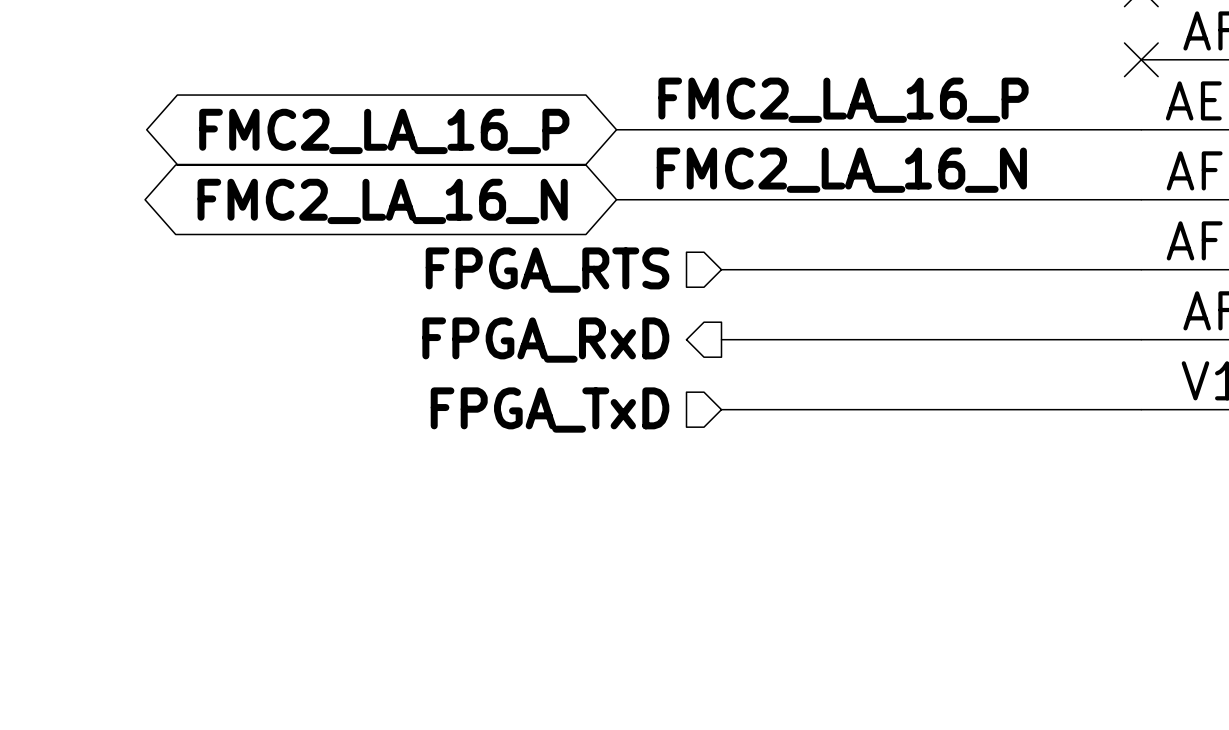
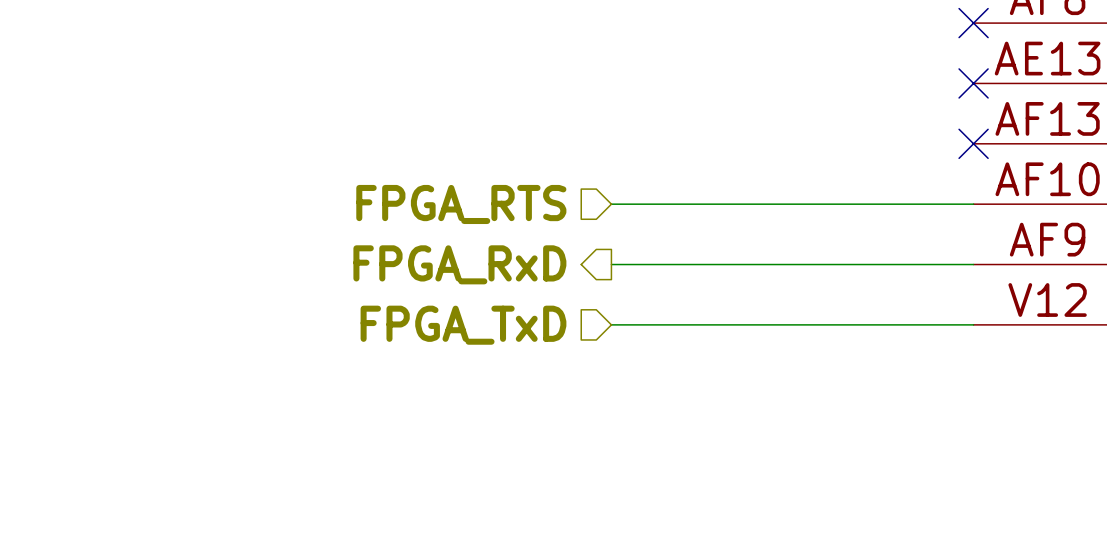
label: FMC2_LA_16_P (843, 100) -> none
wire: (616, 129) (1141, 129) -> none
no-connect mark: none -> (973, 83)
global label: FMC2_LA_16_P (384, 131) -> none
label: FMC2_LA_16_N (841, 170) -> none
wire: (616, 199) (1141, 199) -> none
no-connect mark: none -> (973, 143)
global label: FMC2_LA_16_N (382, 201) -> none

